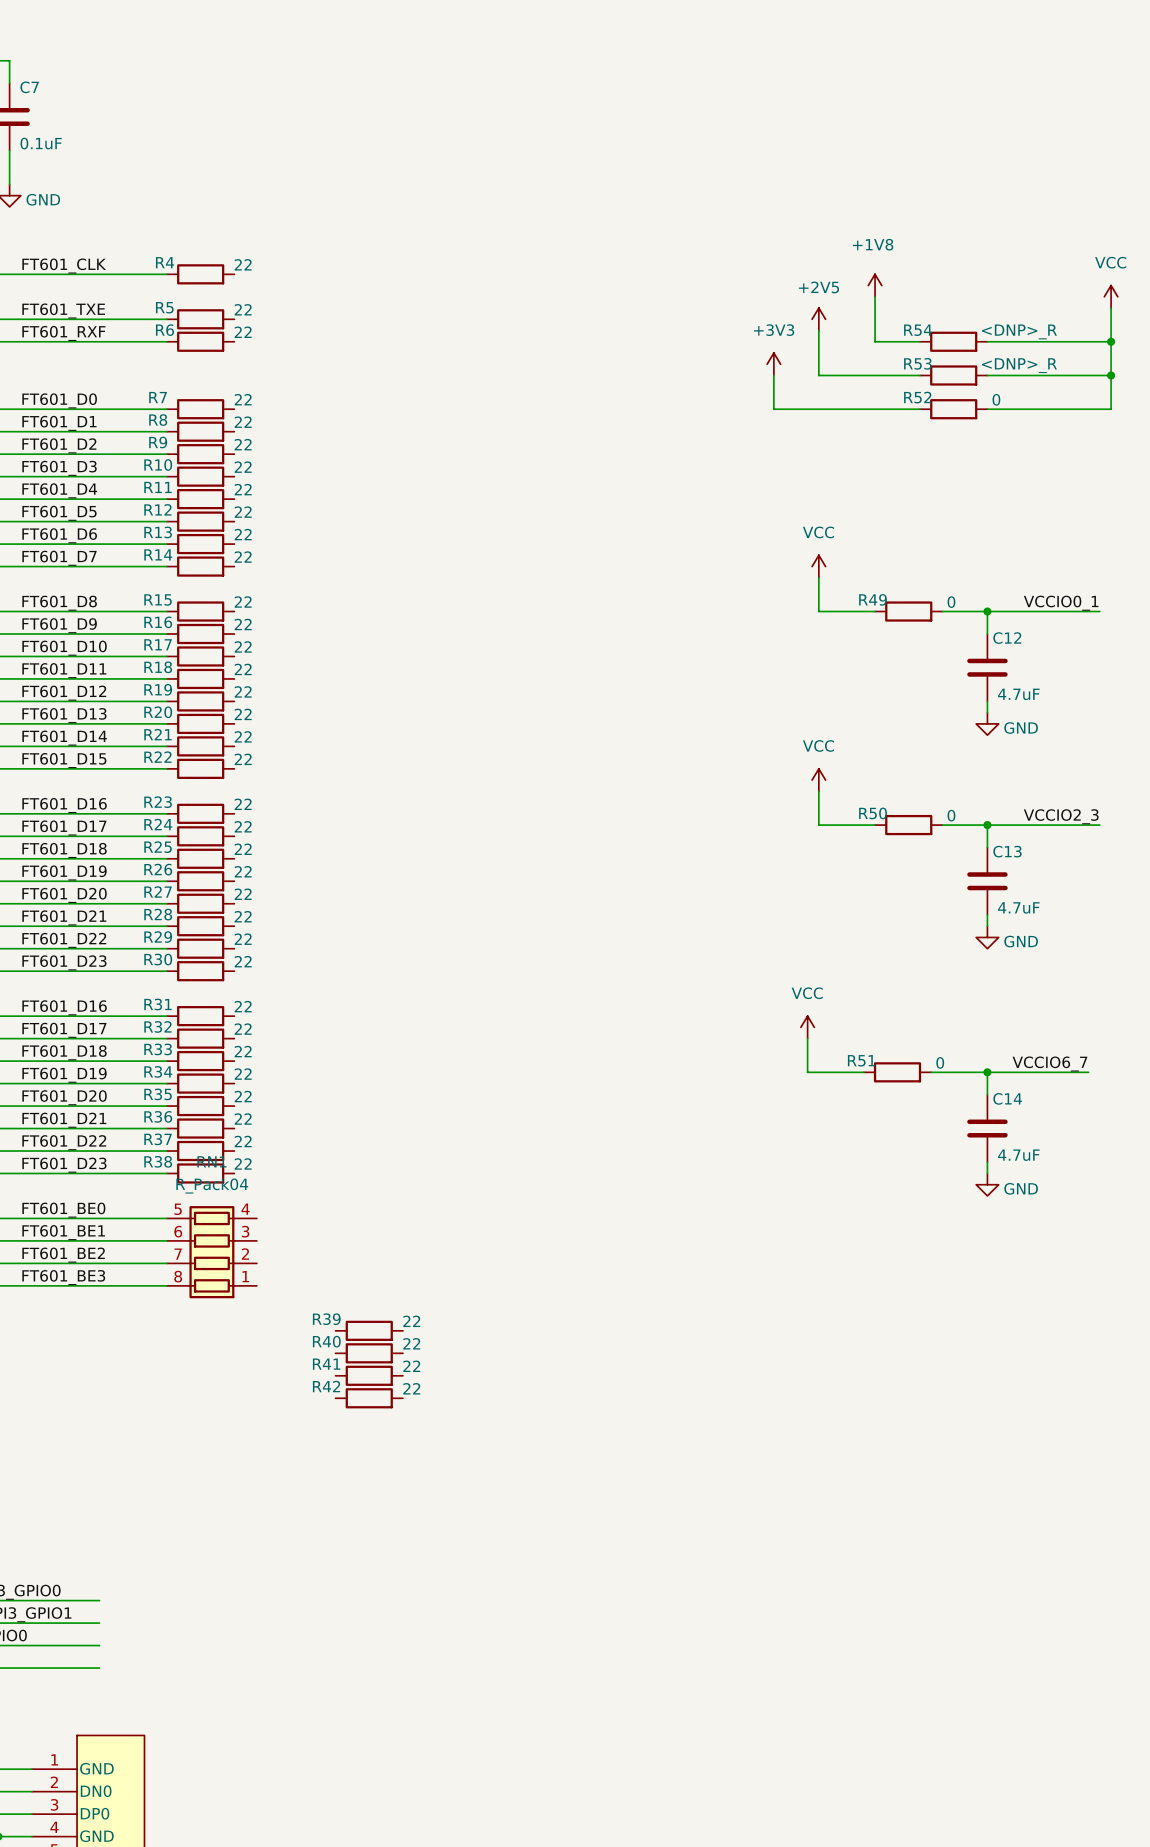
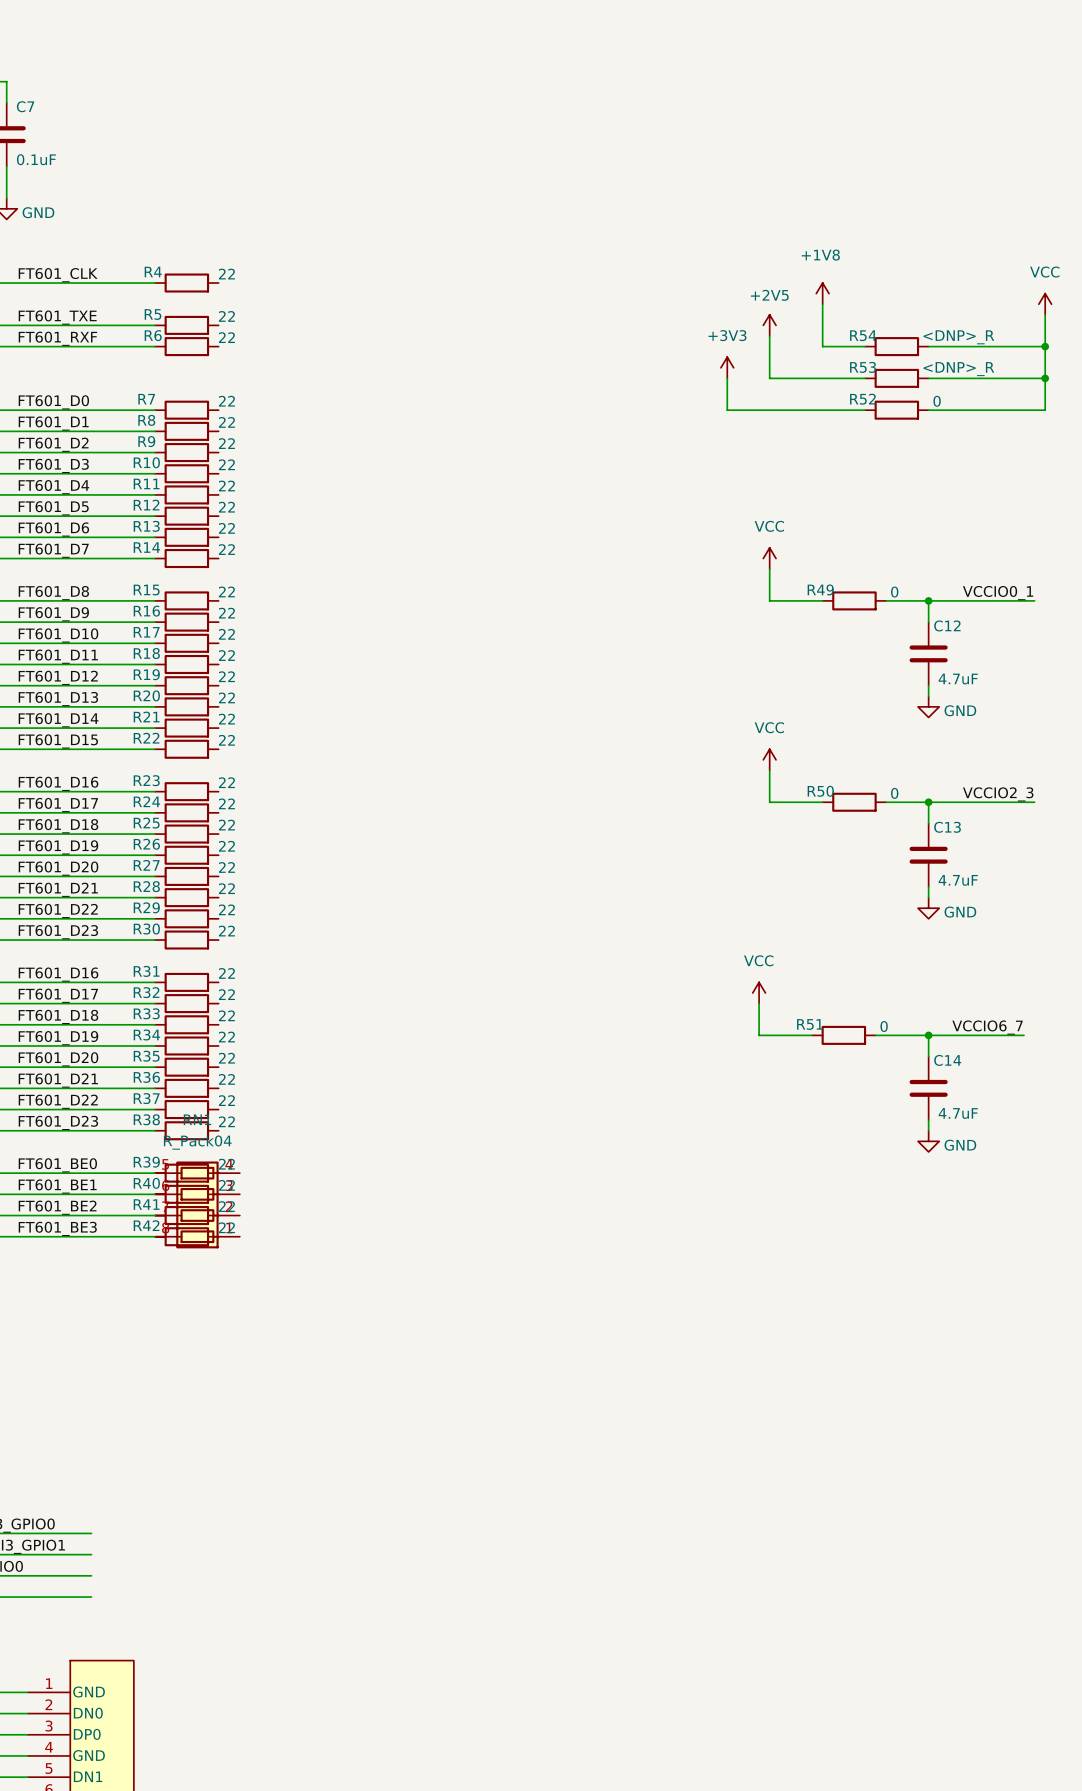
R39 position: (369, 1330) -> (186, 1173)
R40 position: (369, 1353) -> (186, 1194)
R41 position: (369, 1375) -> (186, 1215)
R42 position: (369, 1398) -> (186, 1236)

